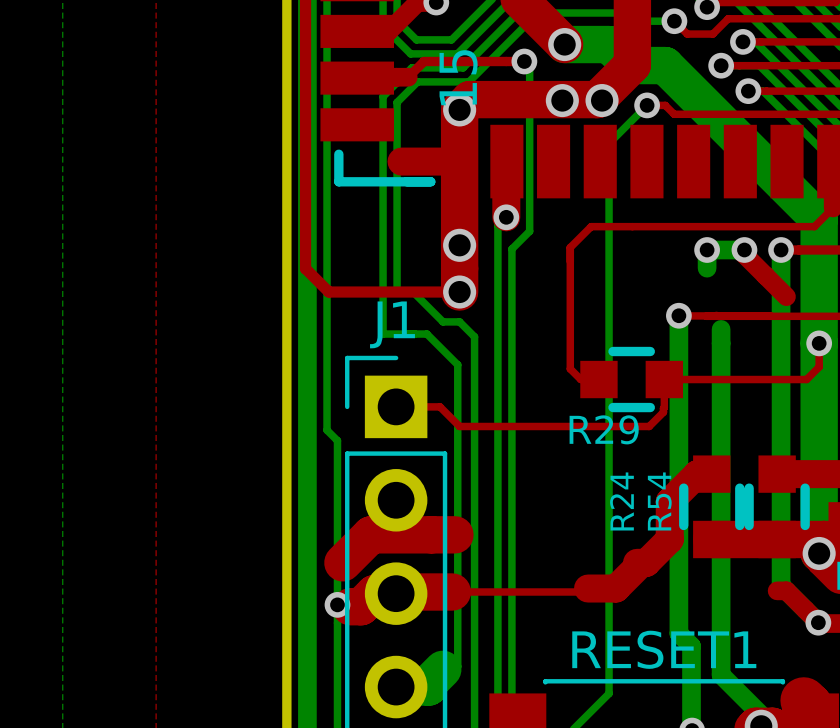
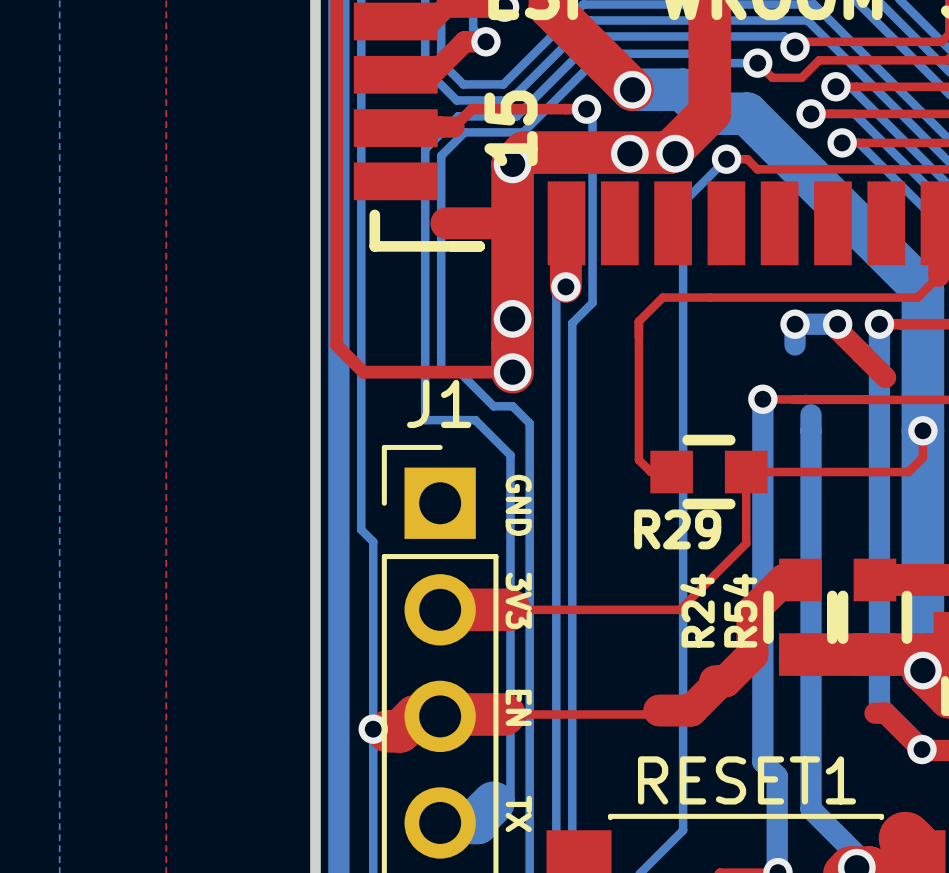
top track: (396, 406) (440, 406) (459, 426) (649, 426) (663, 412) (664, 407) -> (440, 609) (679, 609) (746, 543) (746, 504)
text: none -> GND (518, 505)
text: none -> 3V3 (518, 600)
top track: (454, 534) (370, 534) (342, 562) -> none
text: none -> EN (518, 707)
text: none -> TX (518, 813)

